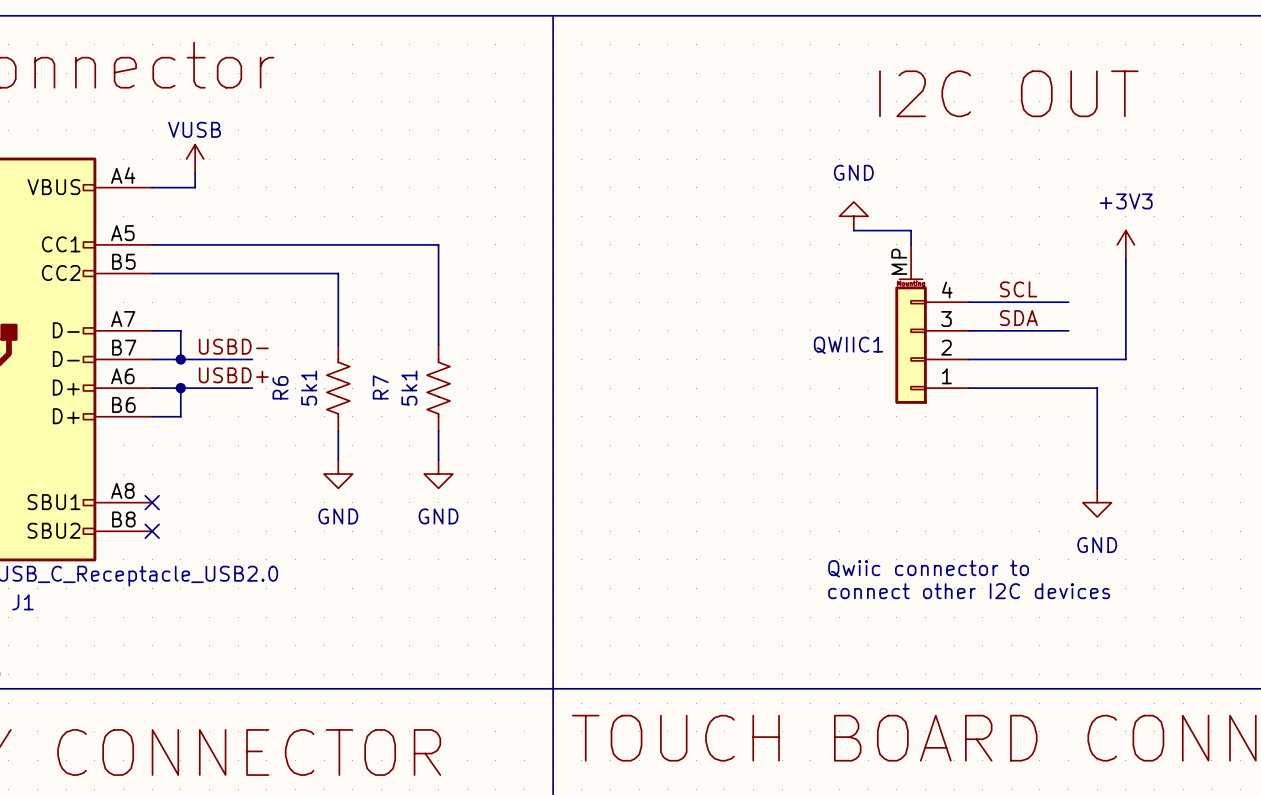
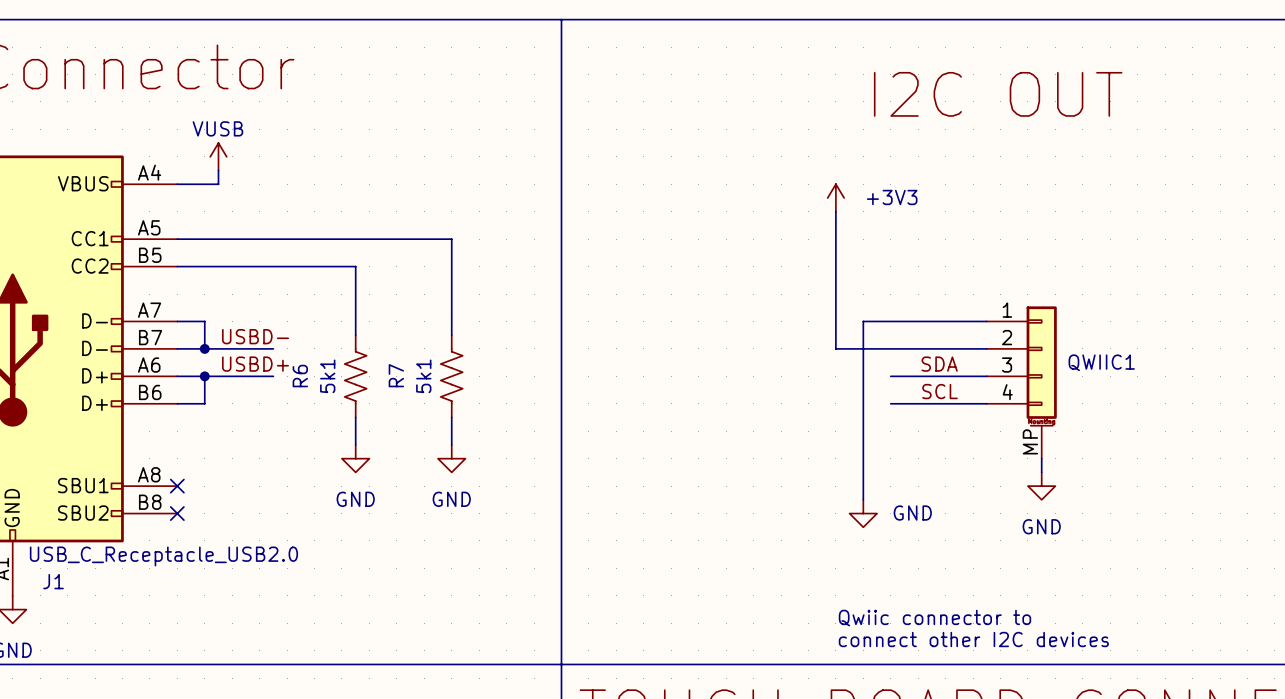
power symbol: none -> +3V3 (835, 197)
wire: none -> (835, 211) (835, 348) (959, 348)
power symbol: GND (853, 216) -> none
wire: (853, 230) (911, 230) (911, 244) -> none
power symbol: +3V3 (1125, 244) -> none
wire: (1125, 259) (1125, 359) (997, 359) -> none
label position: SCL (1018, 289) -> SCL (940, 391)
wire: (968, 302) (1068, 302) -> (890, 403) (986, 403)
label position: SDA (1018, 318) -> SDA (939, 364)
QWIIC1 position: (931, 324) -> (1021, 382)
wire: none -> (959, 321) (863, 321) (863, 499)
QWIIC1 rotation: 0° (911, 341) -> 180° (1041, 366)
wire: (997, 388) (1097, 388) (1097, 488) -> none
wire: none -> (1041, 458) (1041, 472)
power symbol position: GND (1097, 502) -> GND (1041, 486)
power symbol: none -> GND (863, 513)
text position: Qwiic connector to (928, 568) -> Qwiic connector to (934, 618)
text position: connect other I2C devices (969, 591) -> connect other I2C devices (973, 639)

